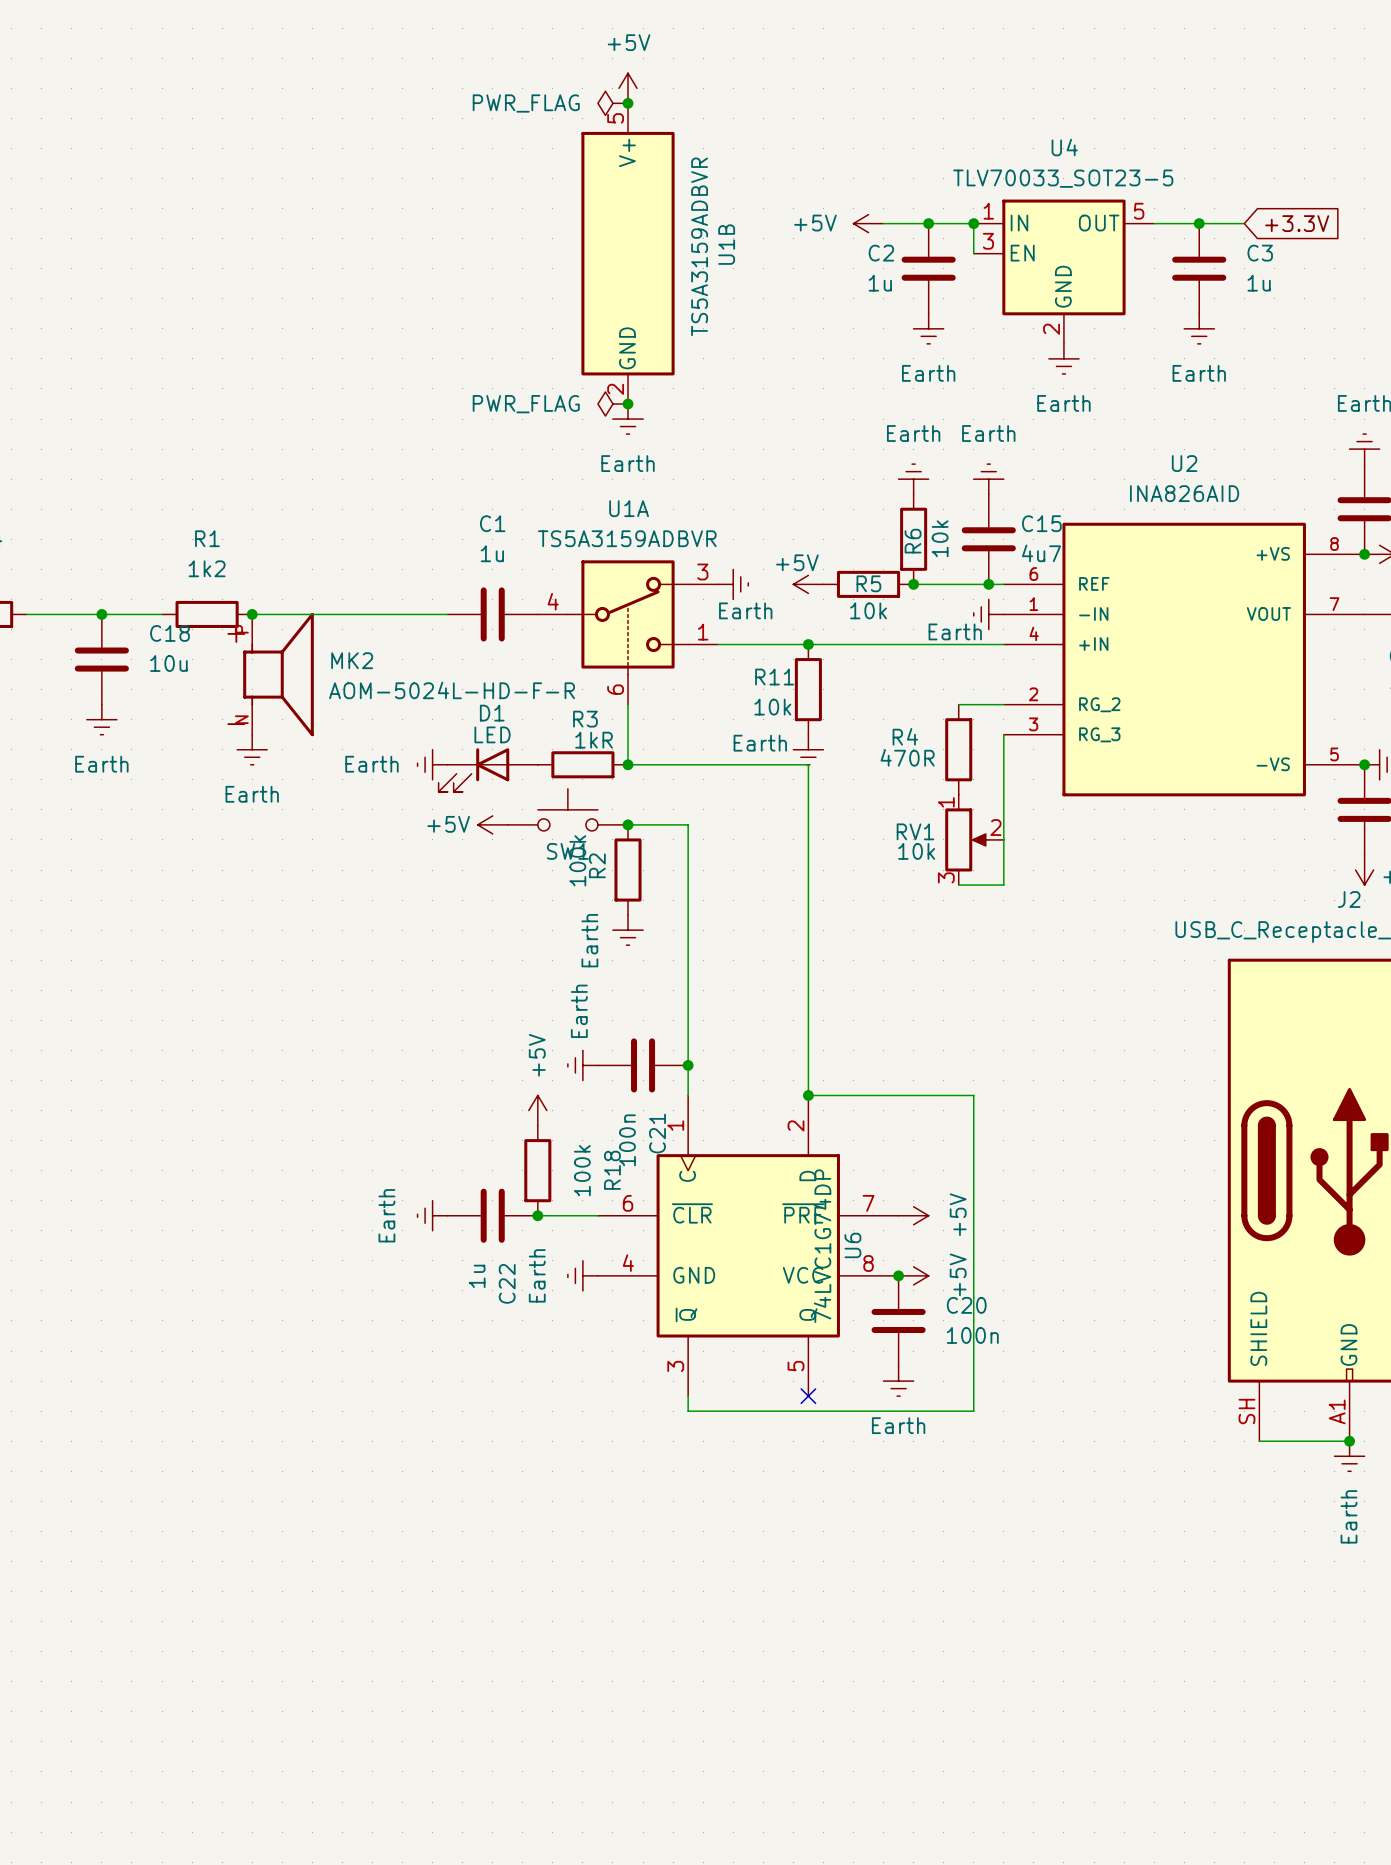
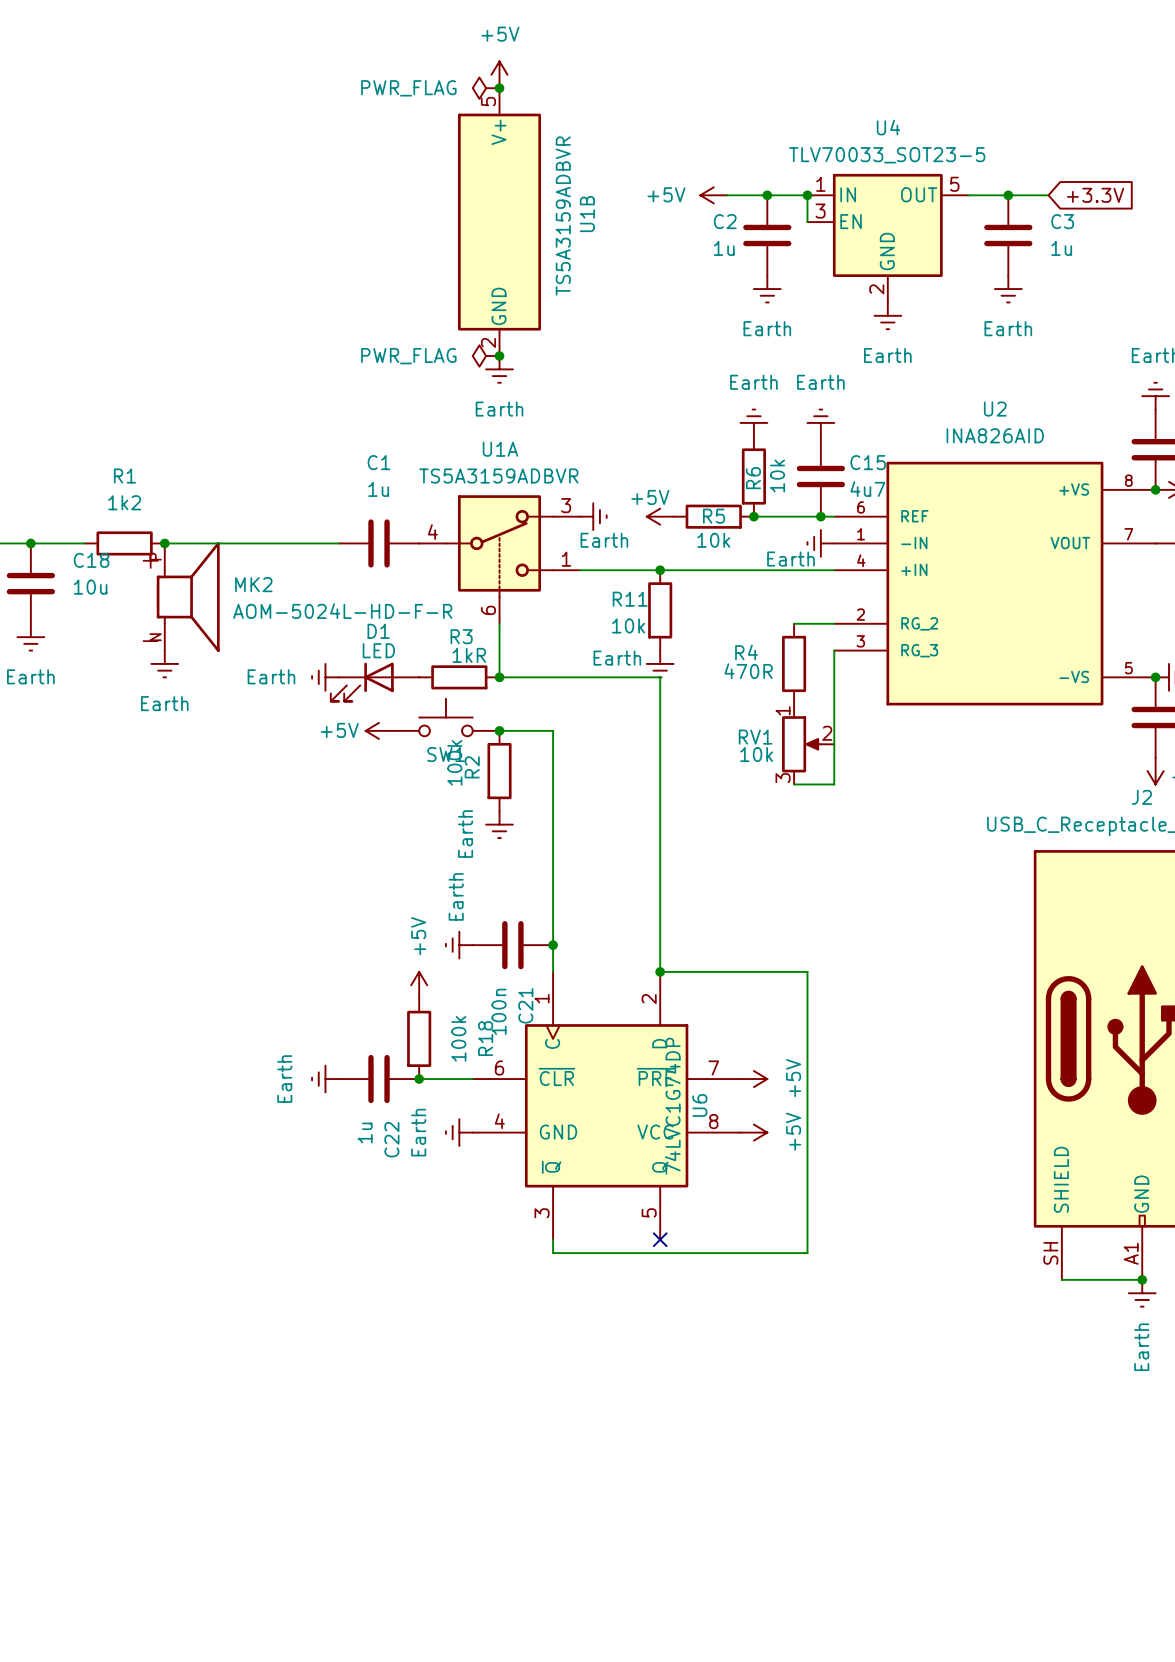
junction: (898, 1275) -> none
C20: 100n (898, 1320) -> none
power symbol: Earth (898, 1381) -> none

